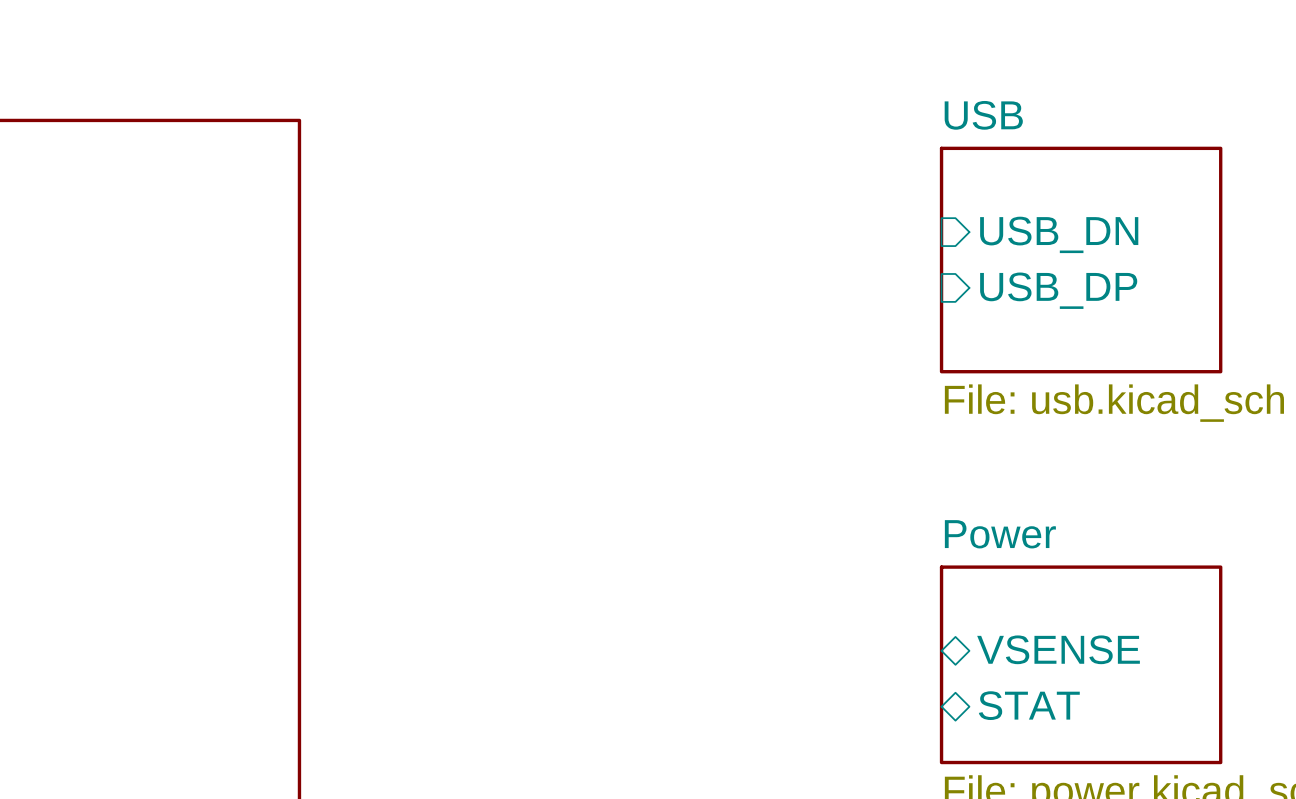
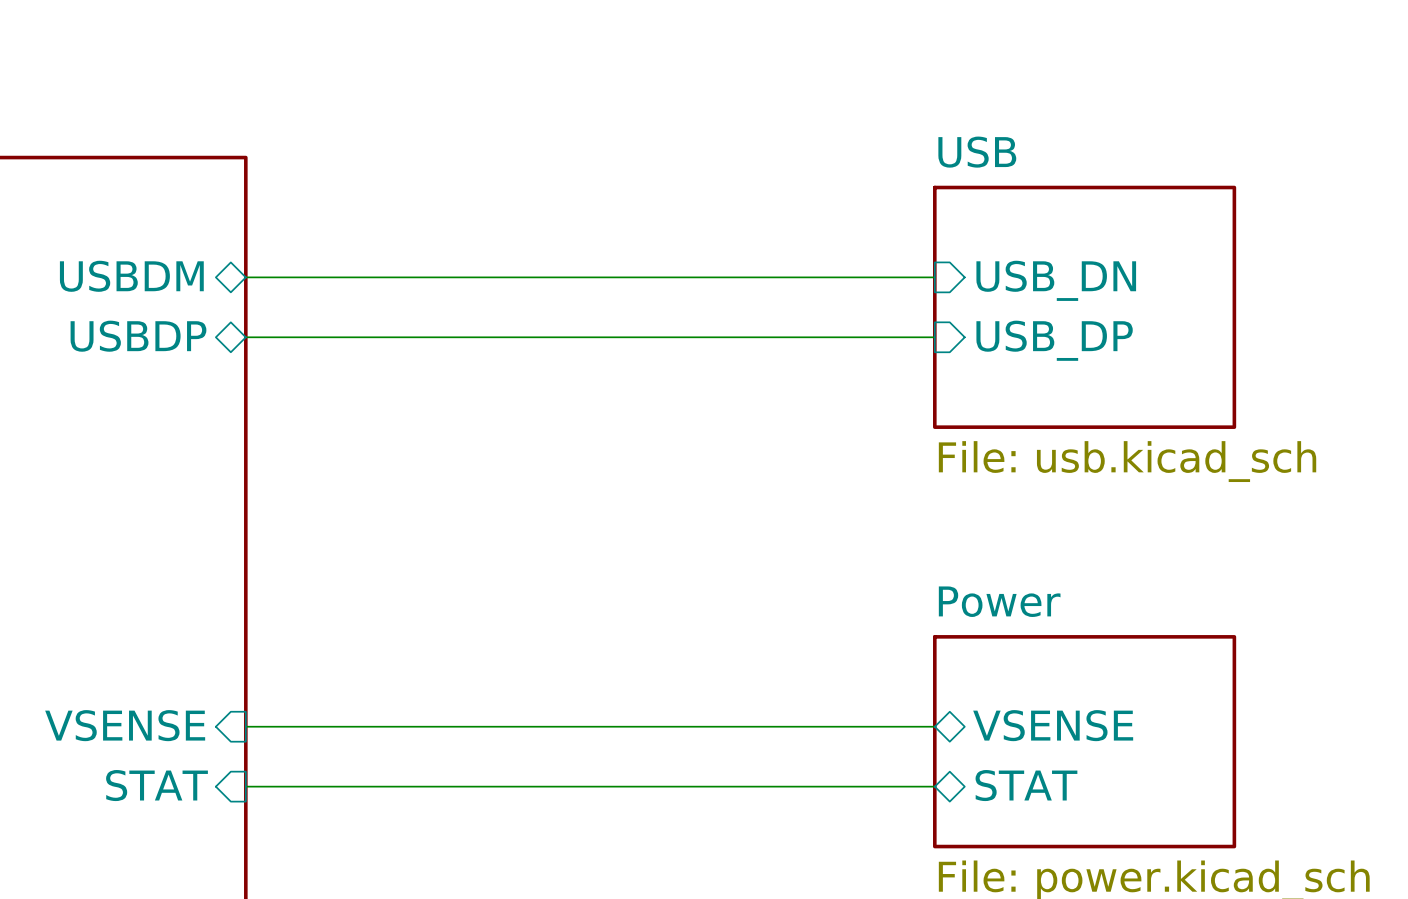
sheet pin: none -> USBDM (131, 276)
wire: none -> (245, 277) (934, 277)
sheet pin: none -> USBDP (138, 336)
wire: none -> (245, 337) (934, 337)
sheet pin: none -> VSENSE (125, 725)
wire: none -> (245, 726) (934, 726)
sheet pin: none -> STAT (157, 785)
wire: none -> (245, 786) (934, 786)

